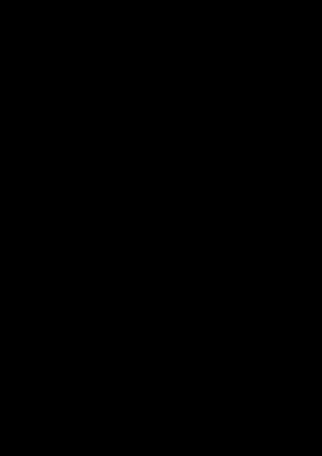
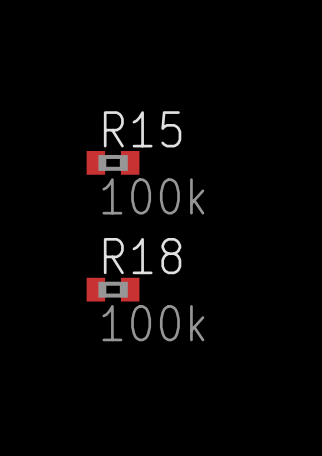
R15: none -> 100k (113, 162)
R18: none -> 100k (113, 289)

